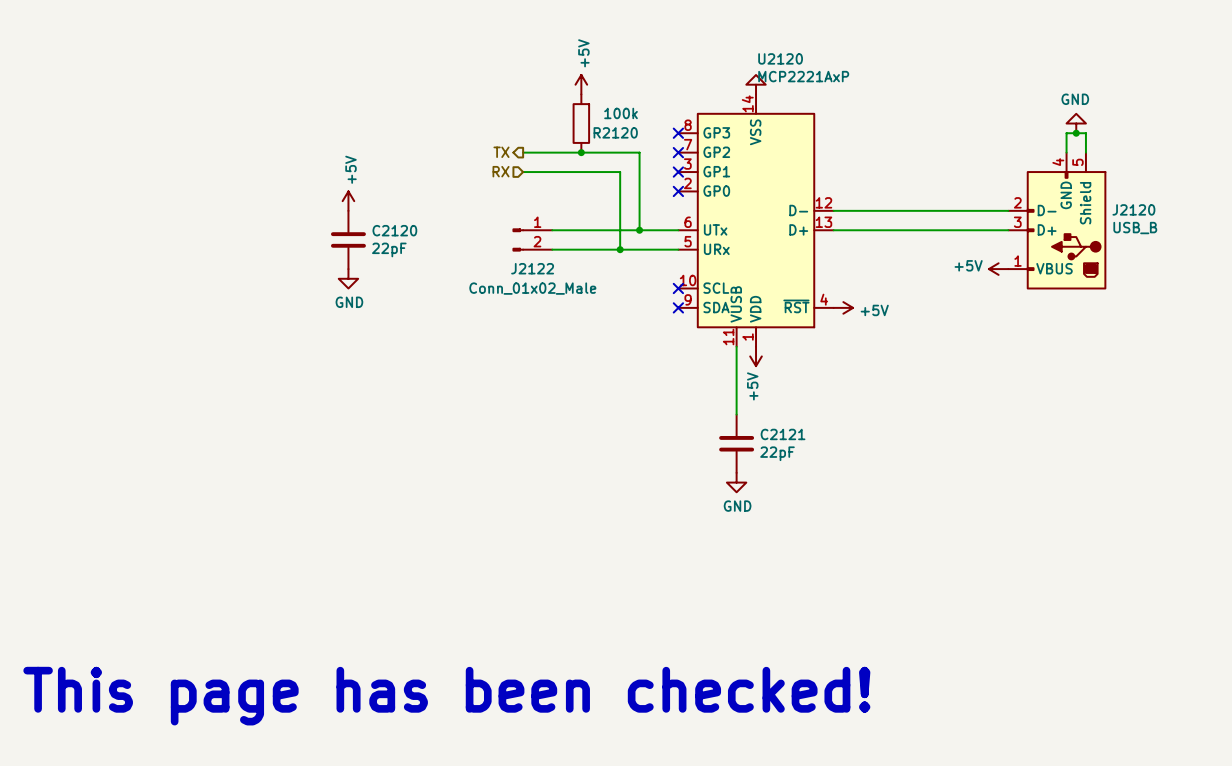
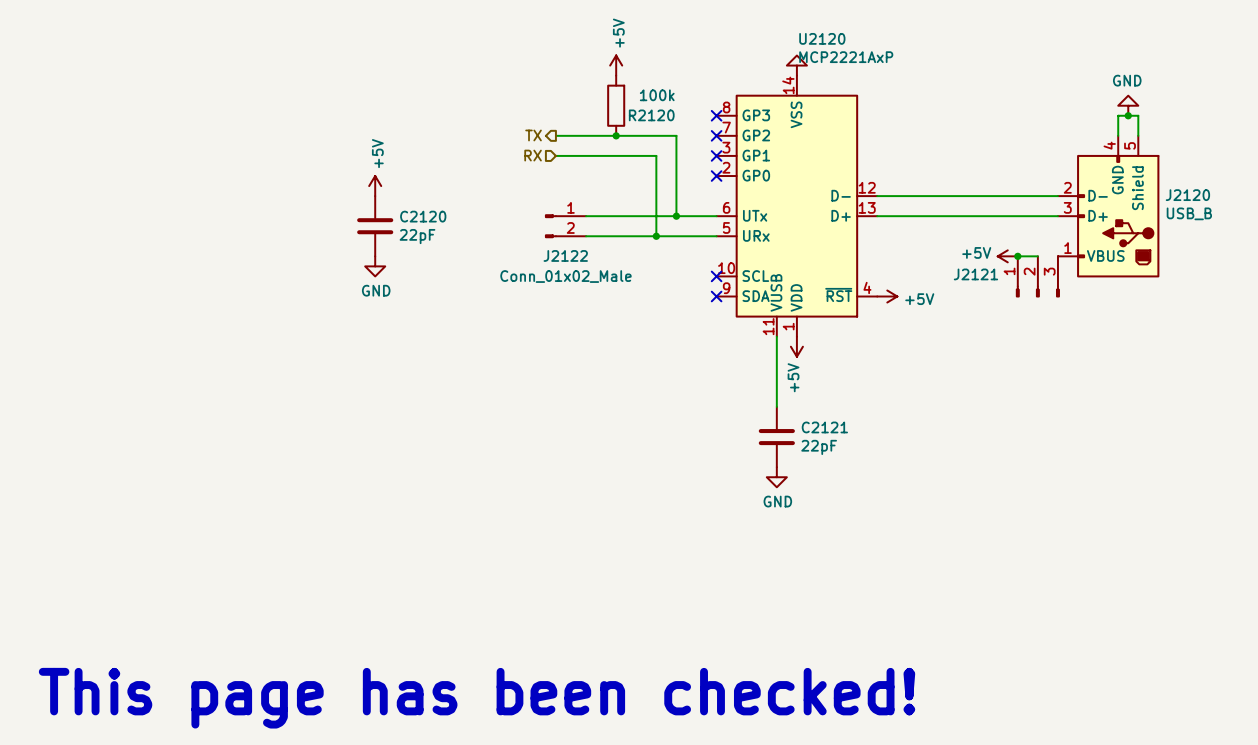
wire: none -> (1017, 256) (1037, 256)
junction: none -> (1017, 256)
power symbol position: +5V (998, 269) -> +5V (1007, 256)
J2121: none -> (1037, 276)

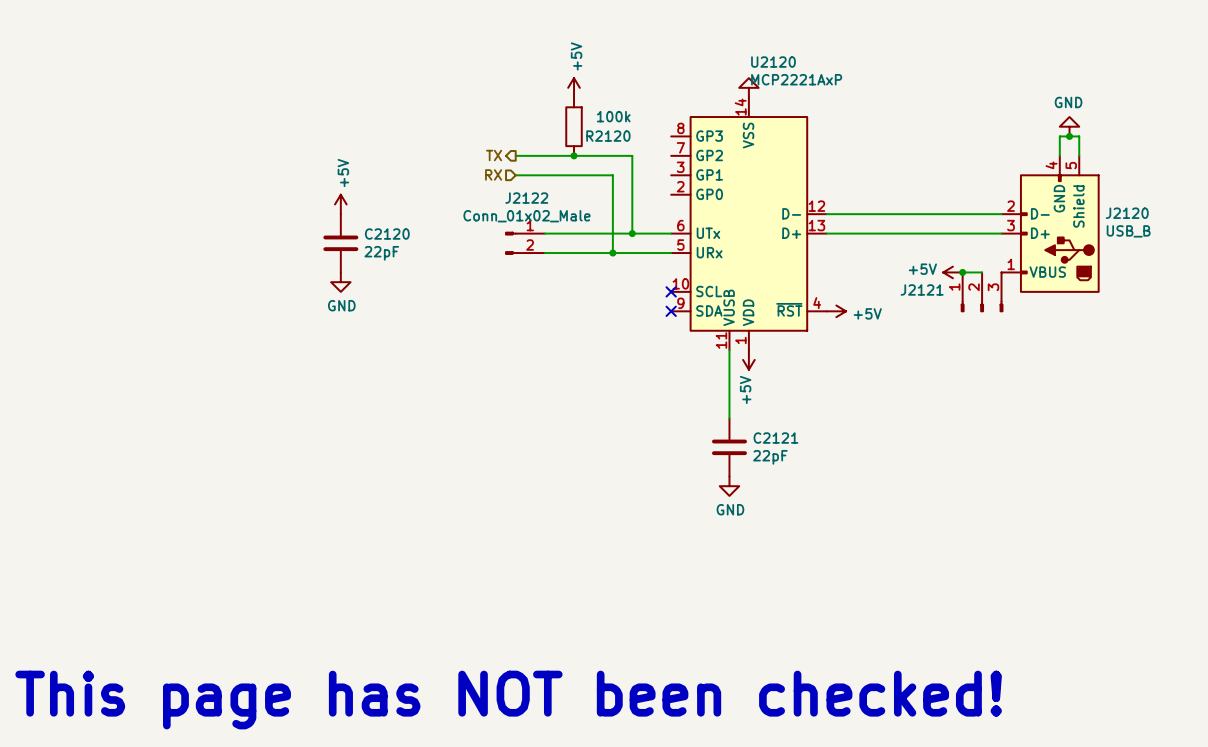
no-connect mark: (716, 115) -> none
no-connect mark: (716, 135) -> none
no-connect mark: (716, 155) -> none
no-connect mark: (716, 176) -> none
J2122 name position: J2122 (565, 255) -> J2122 (526, 198)
J2122 value position: Conn_01x02_Male (565, 276) -> Conn_01x02_Male (526, 216)
text: This page has been checked! (477, 698) -> This page has NOT been checked! (508, 700)

